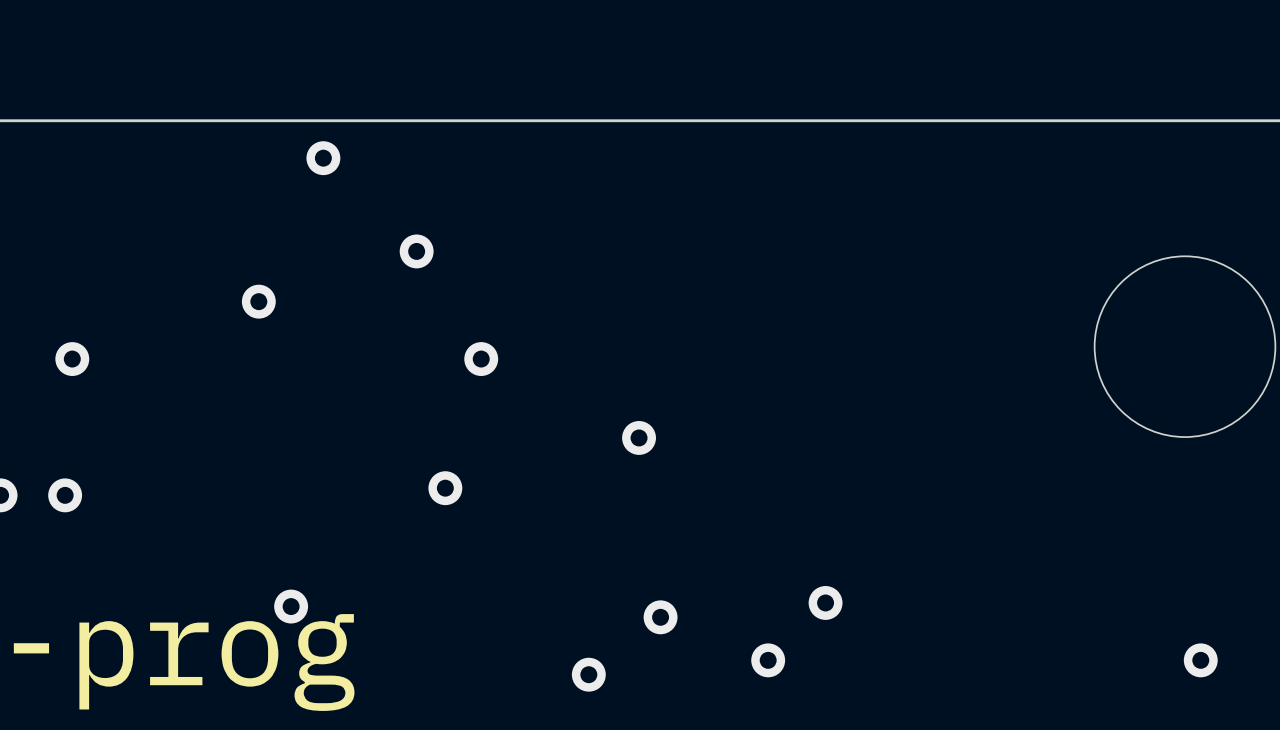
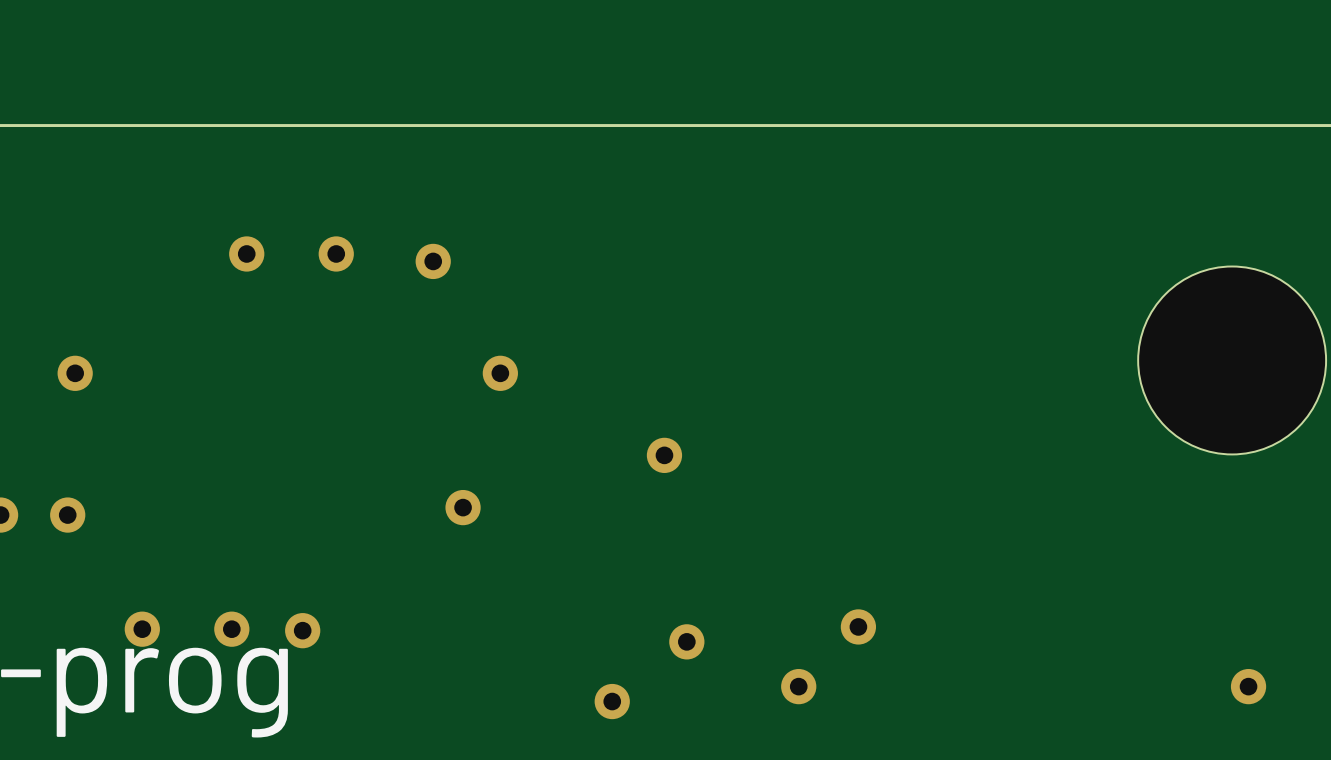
via: (323, 158) -> none
via: none -> (246, 253)
via: none -> (336, 253)
via: (258, 301) -> none
via: none -> (142, 629)
via: none -> (231, 629)

